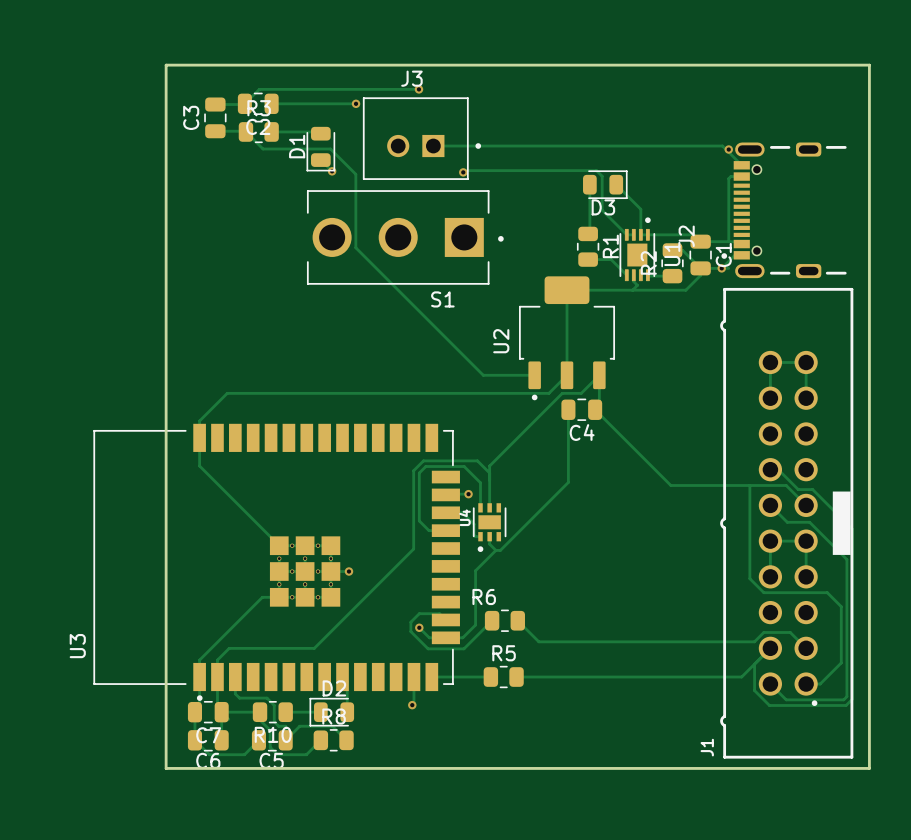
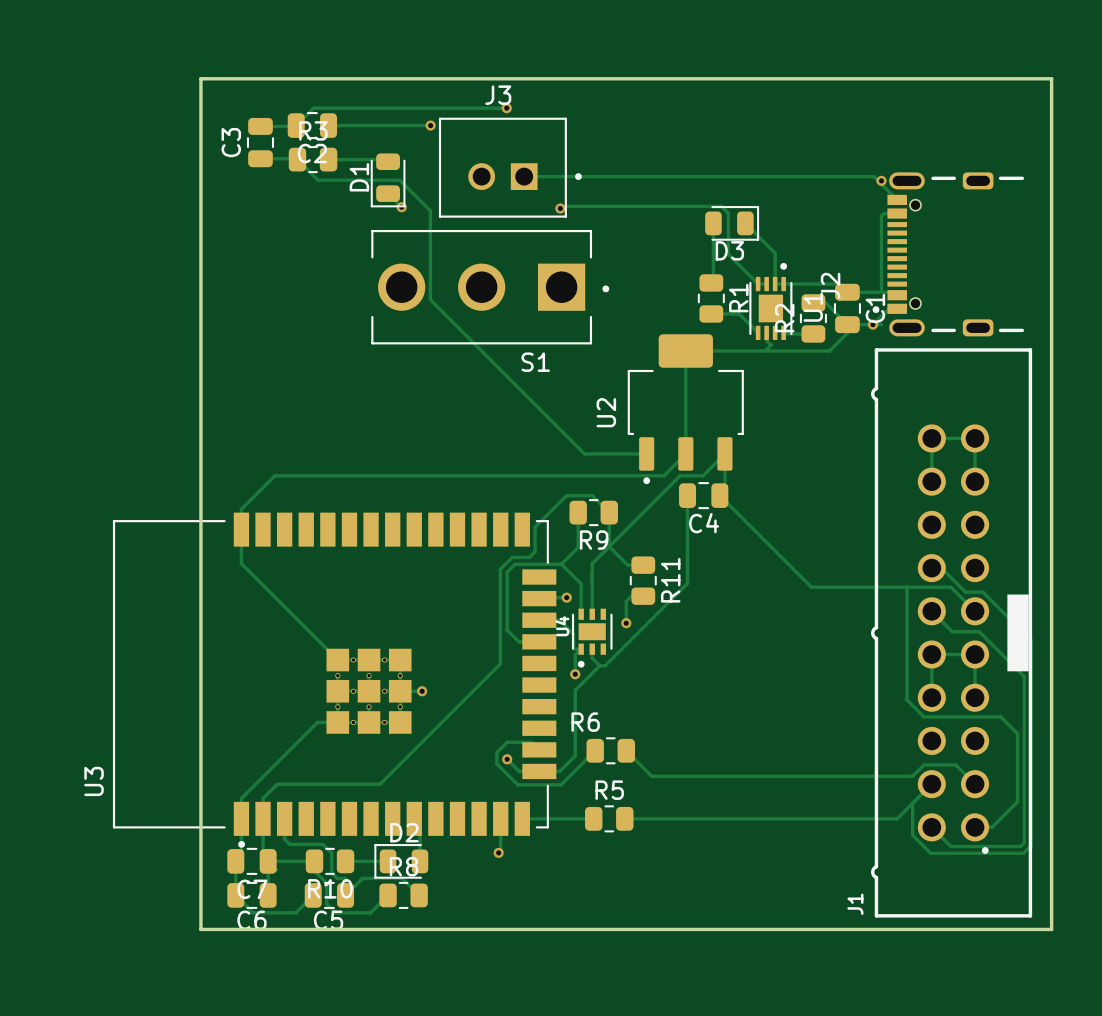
track: none -> (578, 512) (578, 547) (561, 564)
R9: none -> (593, 512)
track: (437, 460) (477, 460) (489, 473) -> (529, 557) (535, 551) (535, 527) (566, 495) (592, 495) (609, 512) (609, 546) (627, 565) (643, 565)
R11: none -> (643, 580)
track: none -> (643, 596) (631, 596) (626, 601) (626, 623)
via: none -> (626, 623)
track: none -> (581, 649) (575, 655) (575, 674)
via: none -> (575, 674)

